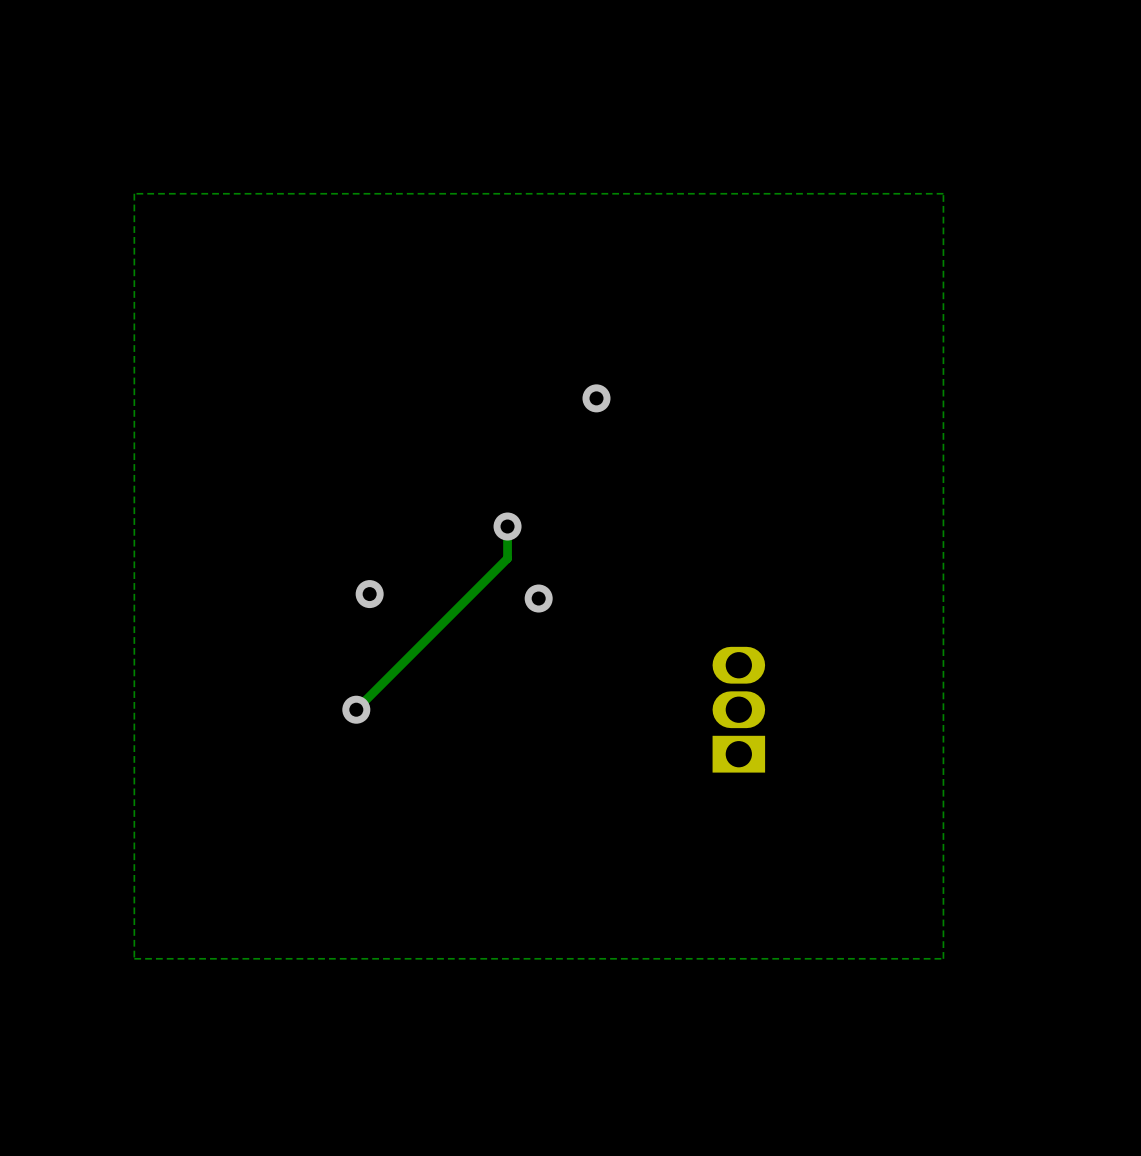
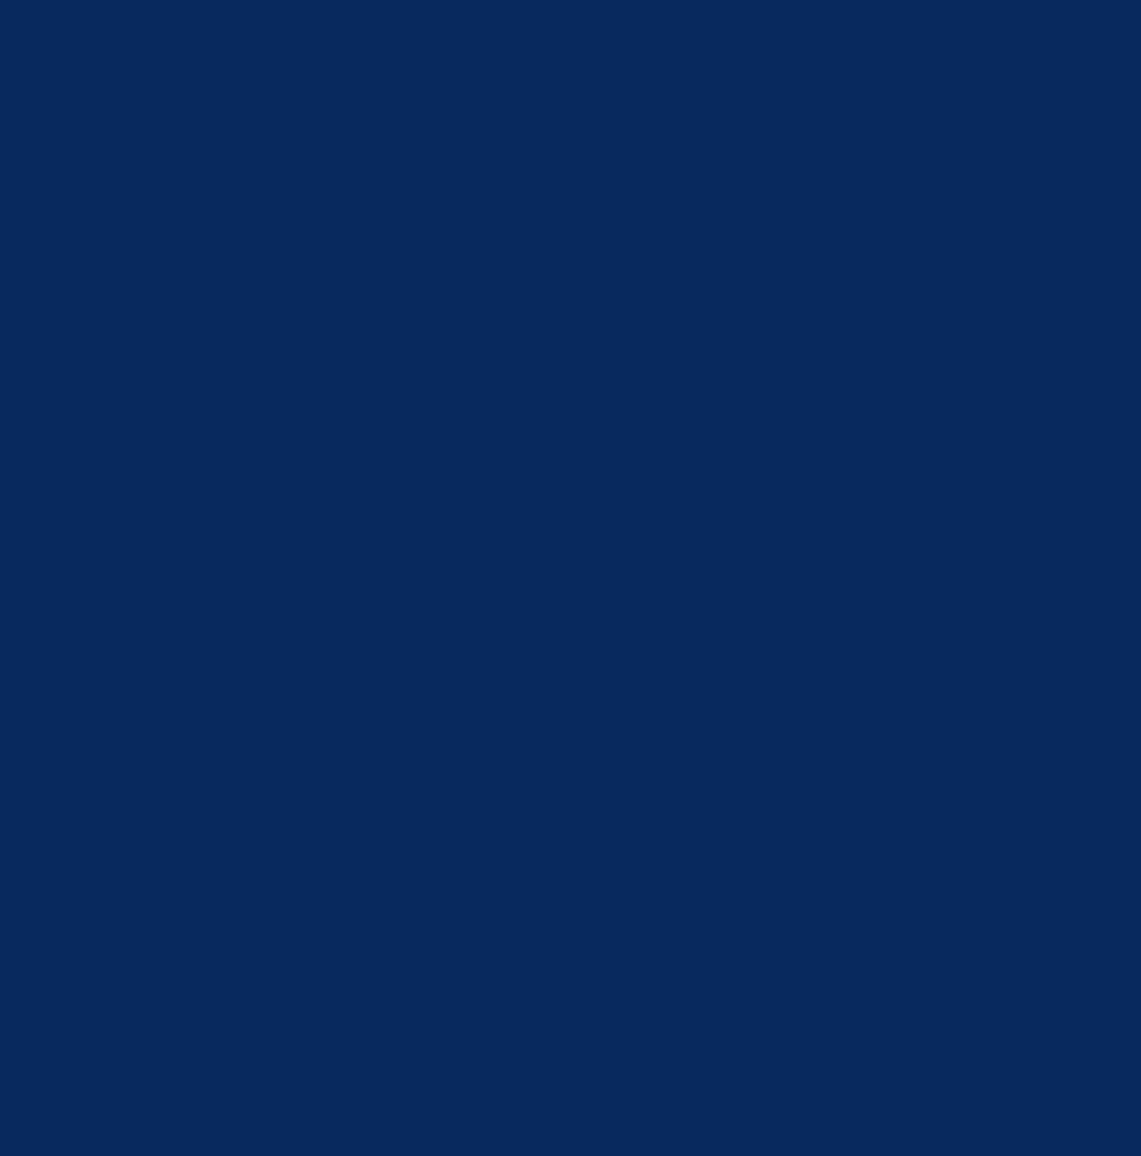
zone outline: (943, 193) (943, 958) (134, 958) (134, 193) (943, 193) -> none
via: (596, 398) -> none
track: (507, 526) (507, 558) (356, 709) -> none
via: (507, 526) -> none
via: (369, 594) -> none
via: (538, 598) -> none
via: (356, 709) -> none
part: (738, 709) -> none

